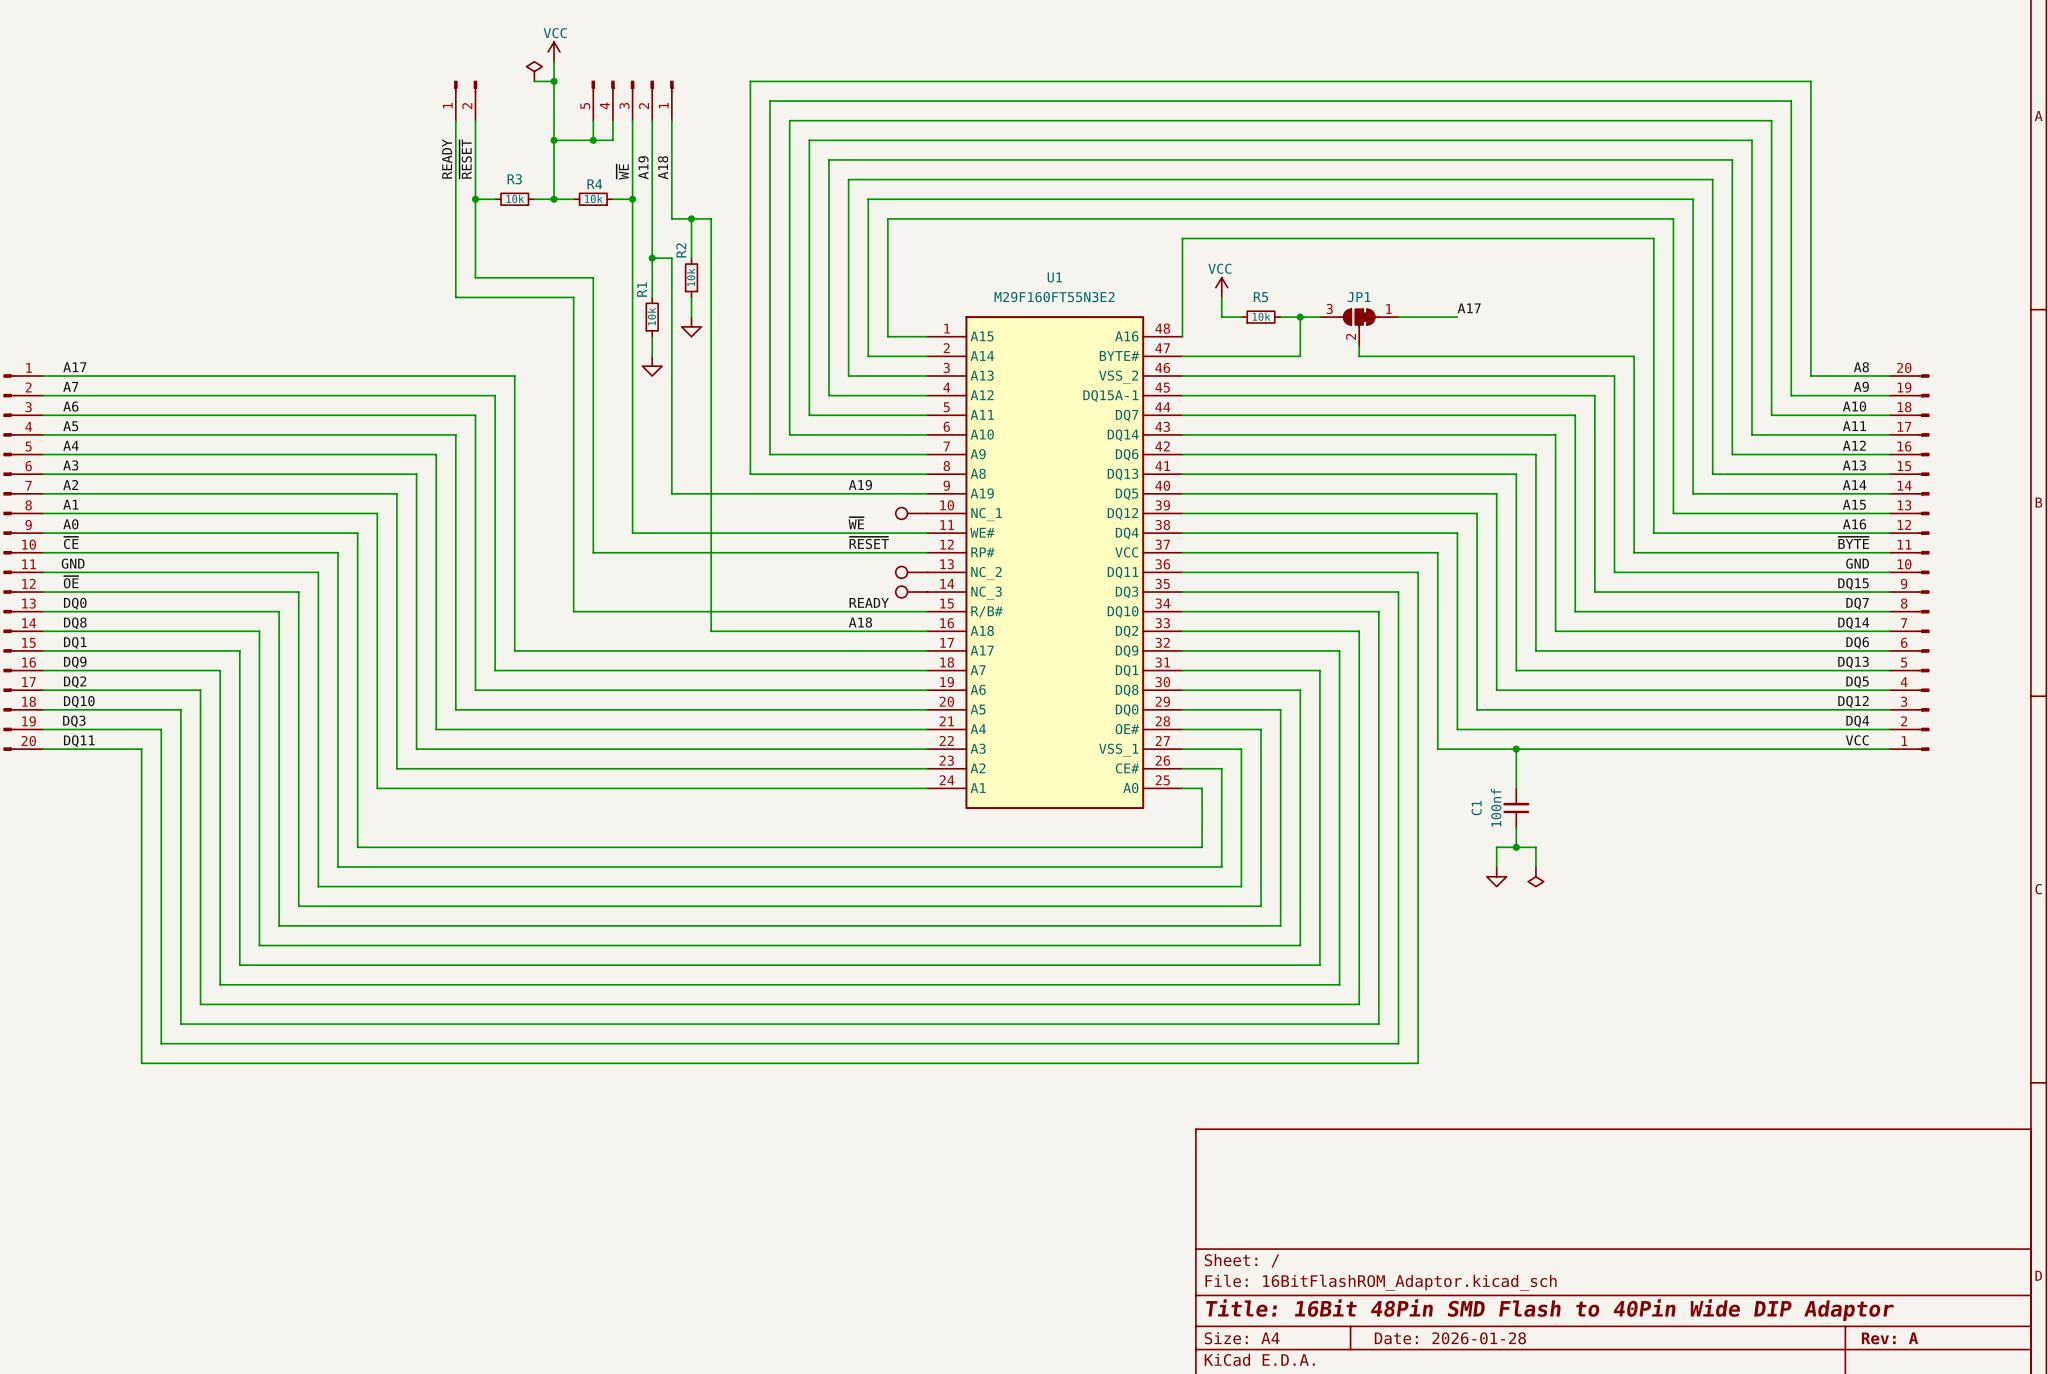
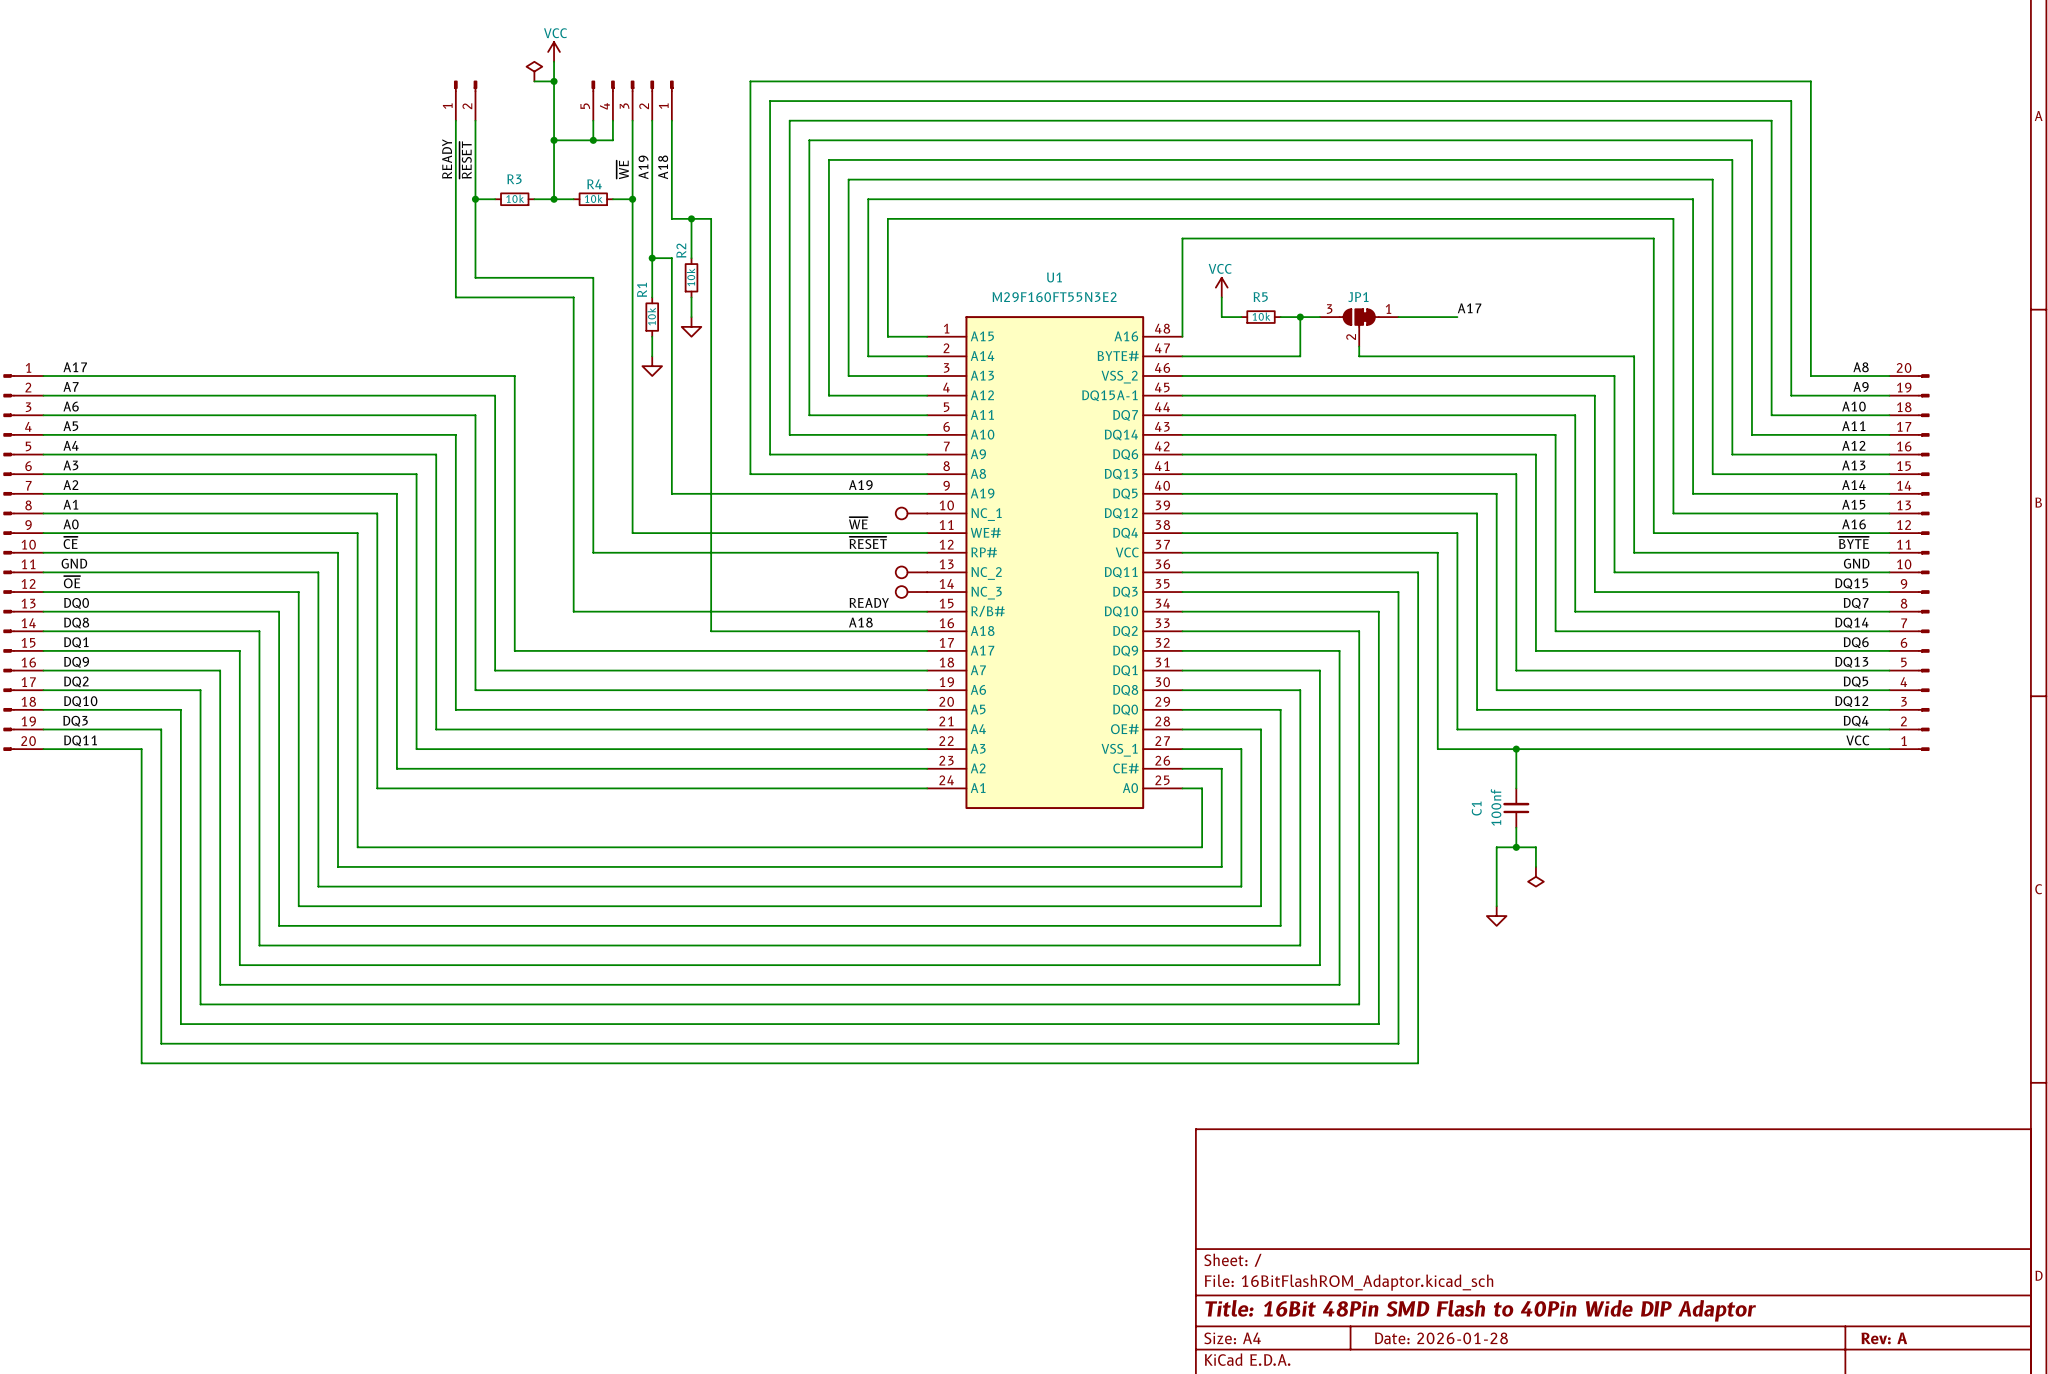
wire: none -> (1496, 866) (1496, 906)
power symbol position: (1496, 876) -> (1496, 916)

